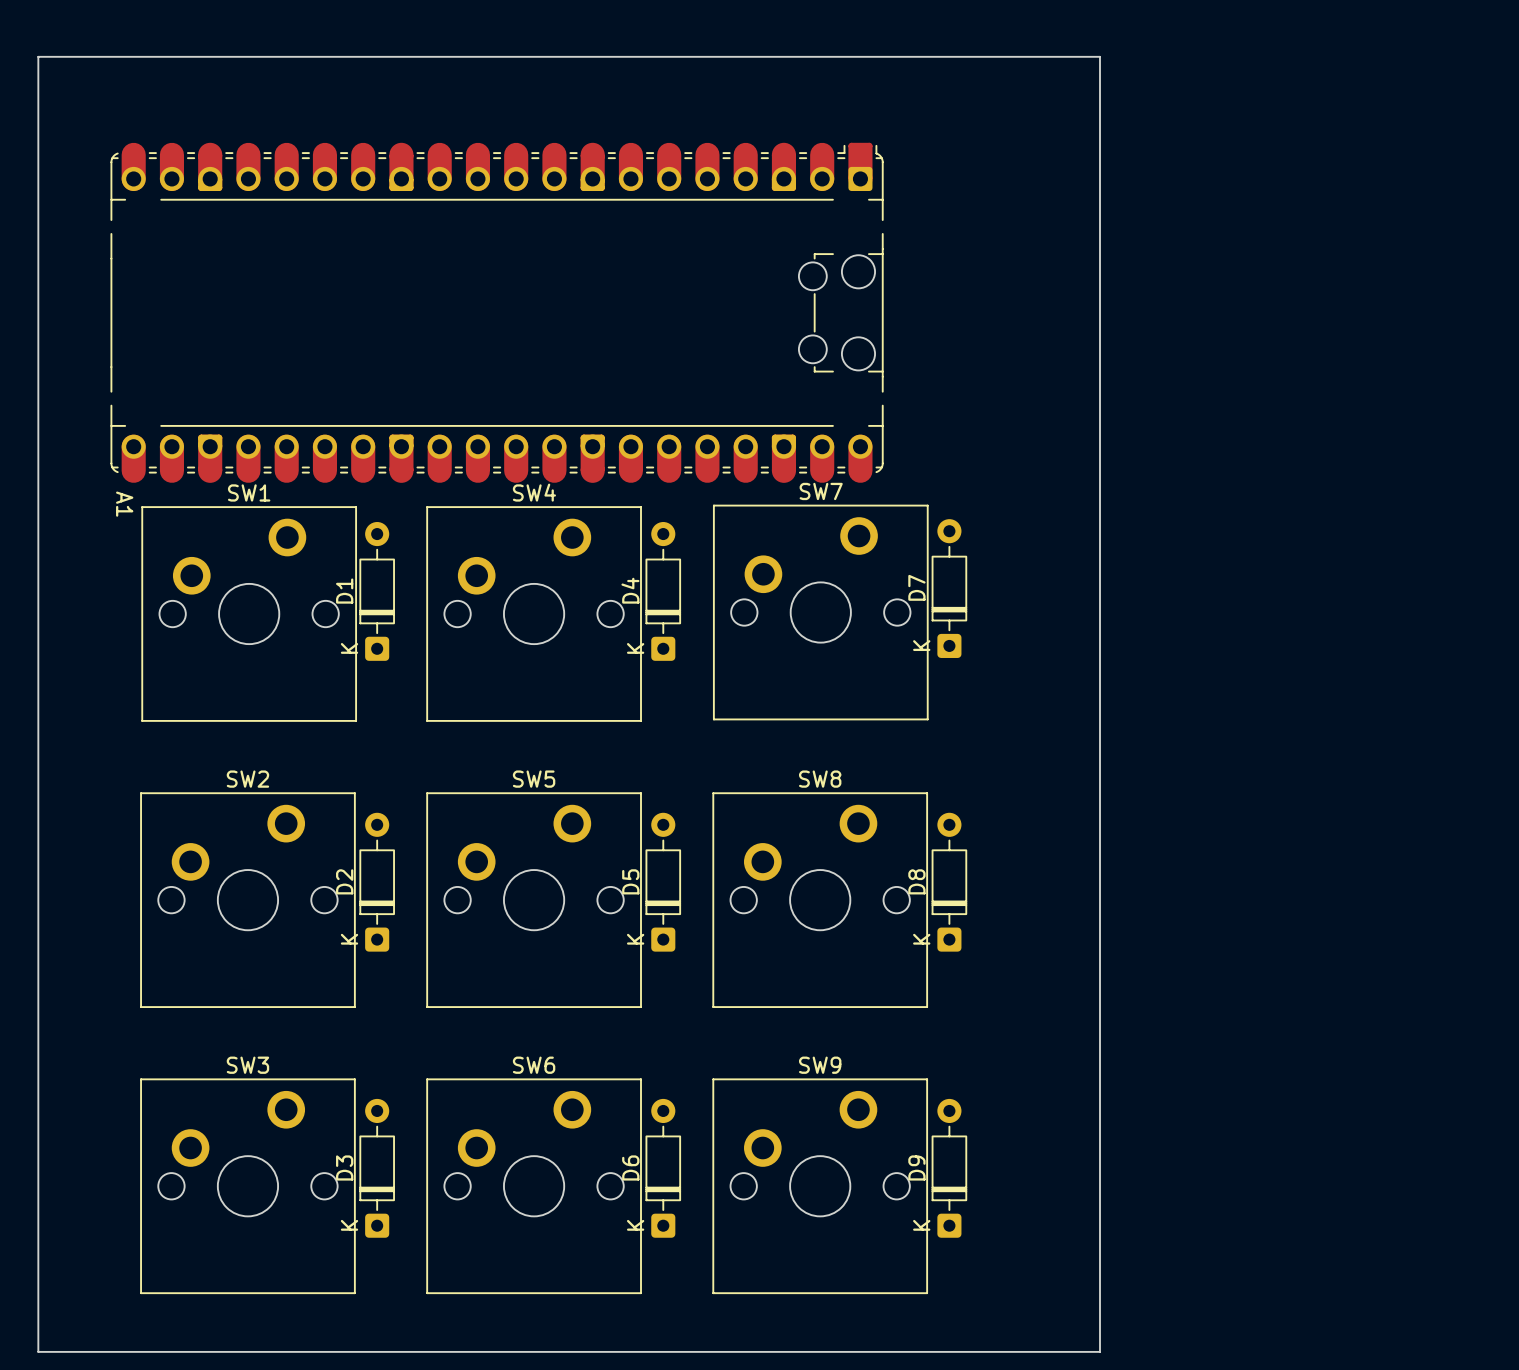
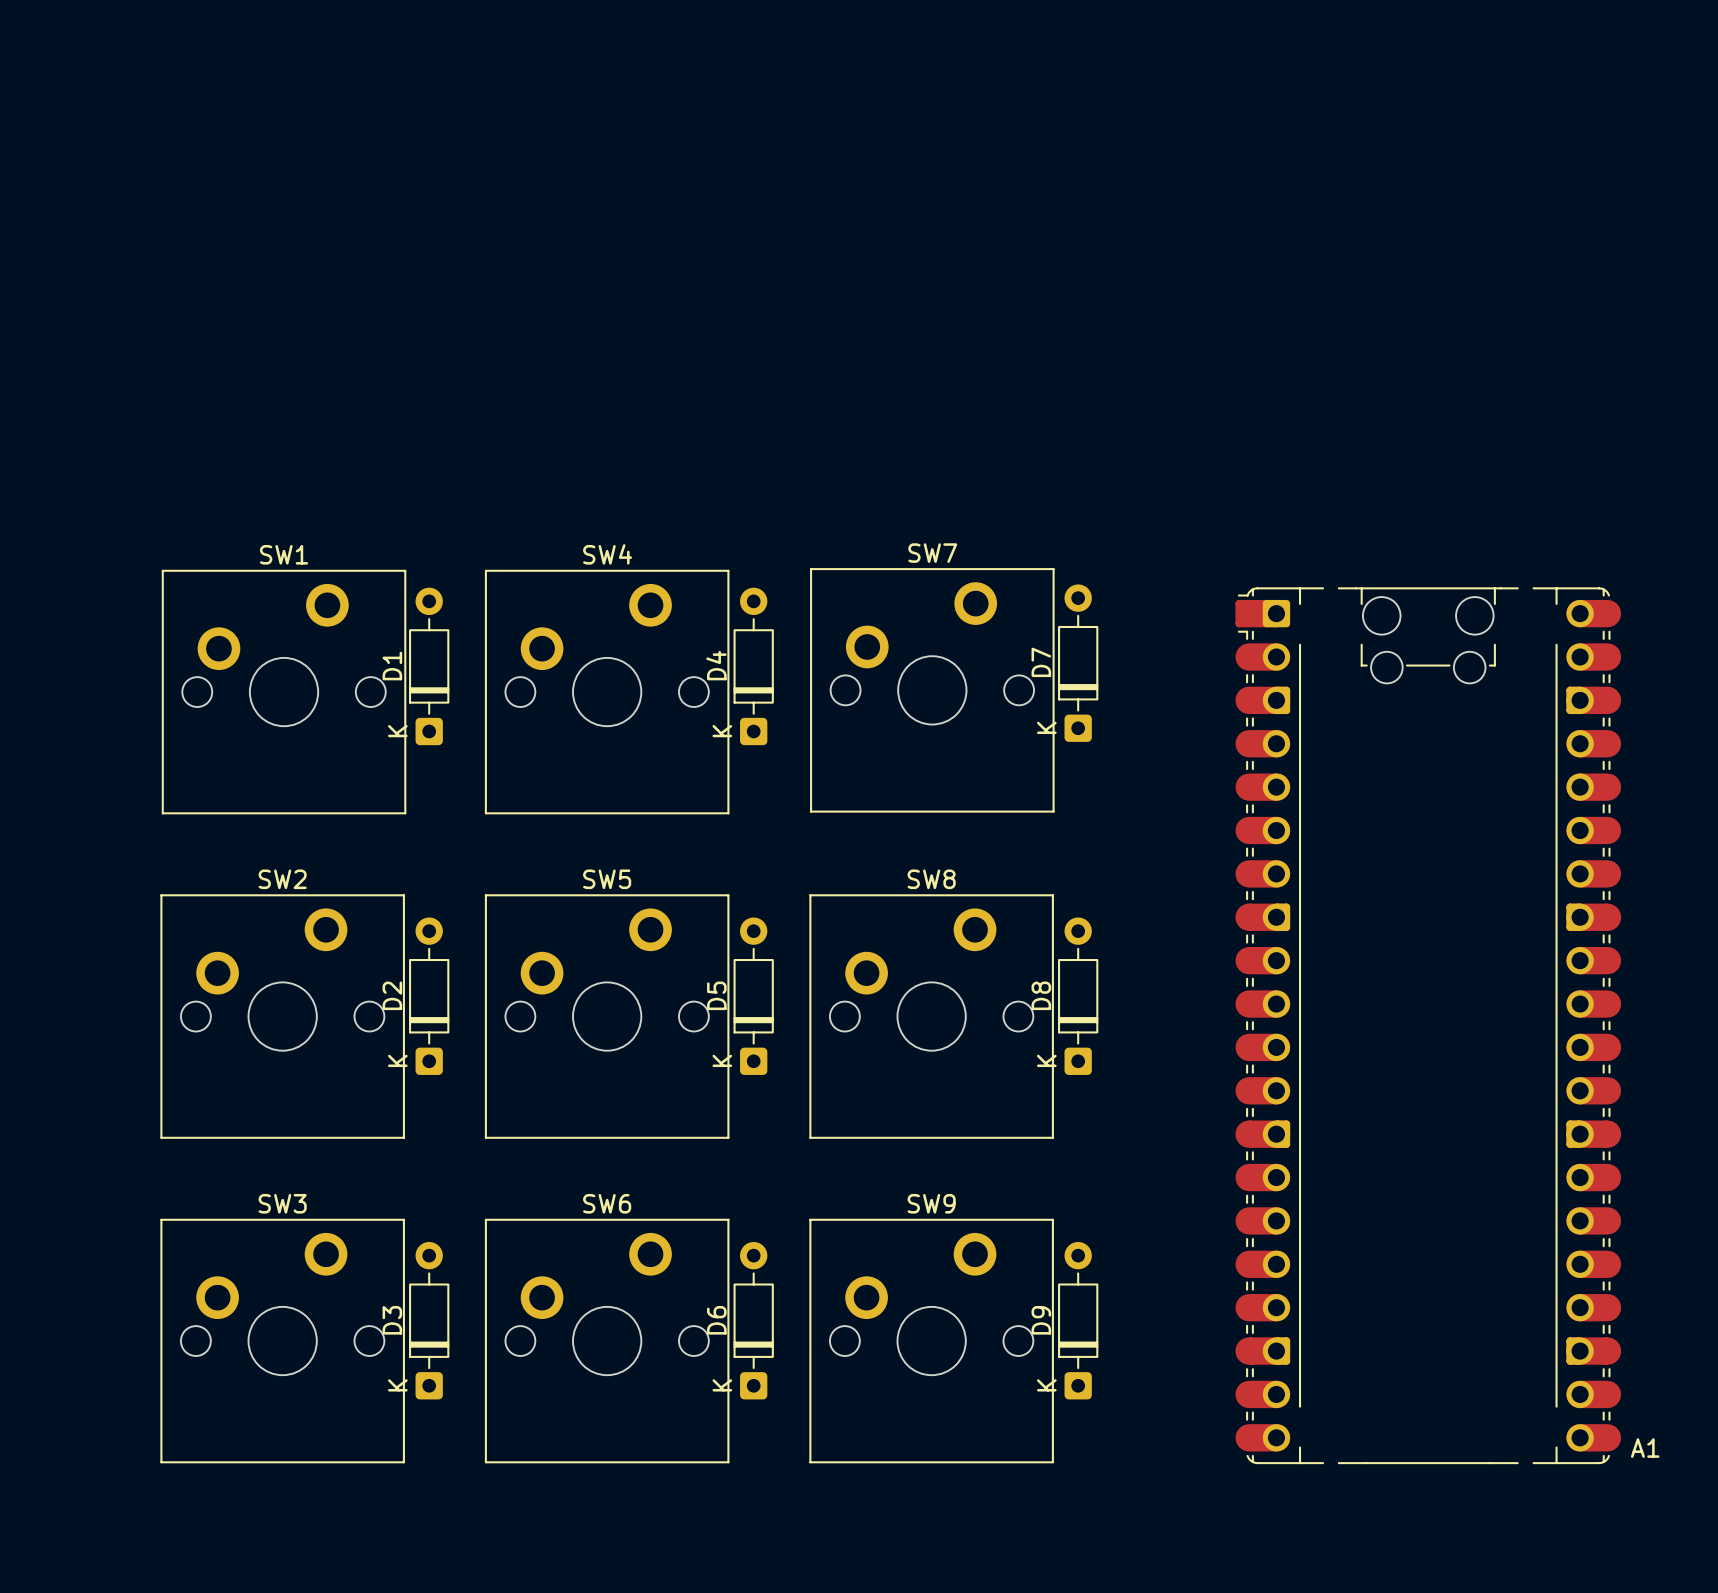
board edge: (38, 56) (1100, 56) (1100, 1351) (38, 1351) (38, 56) -> none
A1 footprint: [110, 142, 884, 483] -> [1235, 587, 1622, 1465]
A1 name position: A1 (124, 504) -> A1 (1645, 1448)

